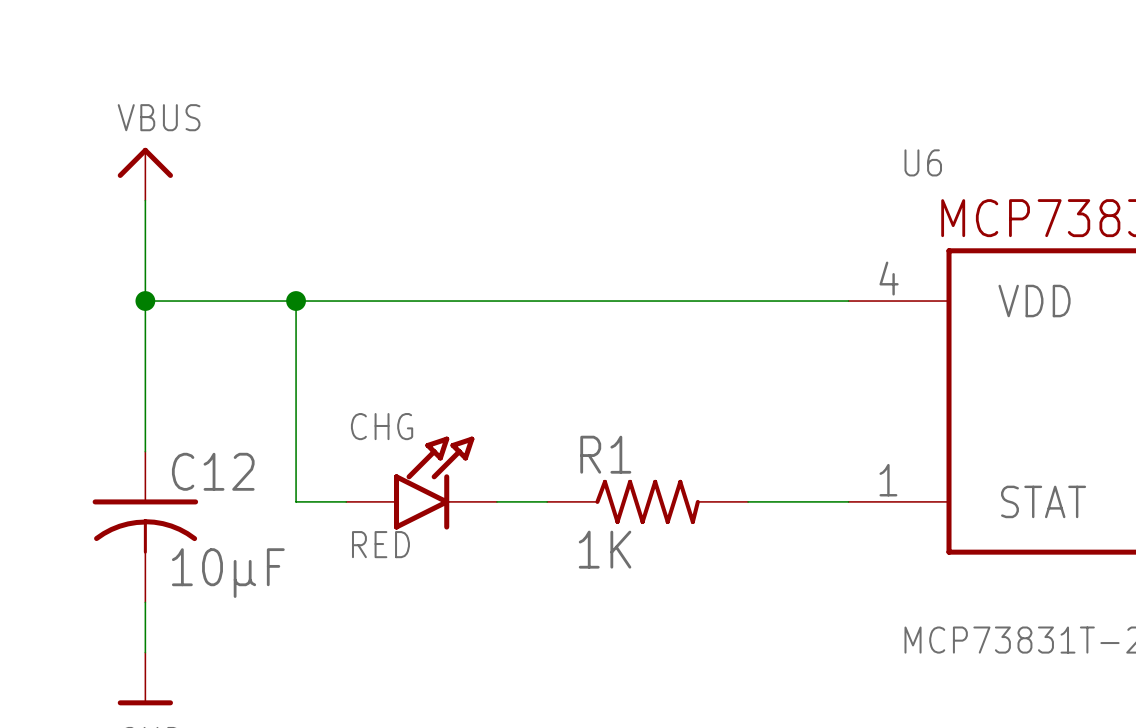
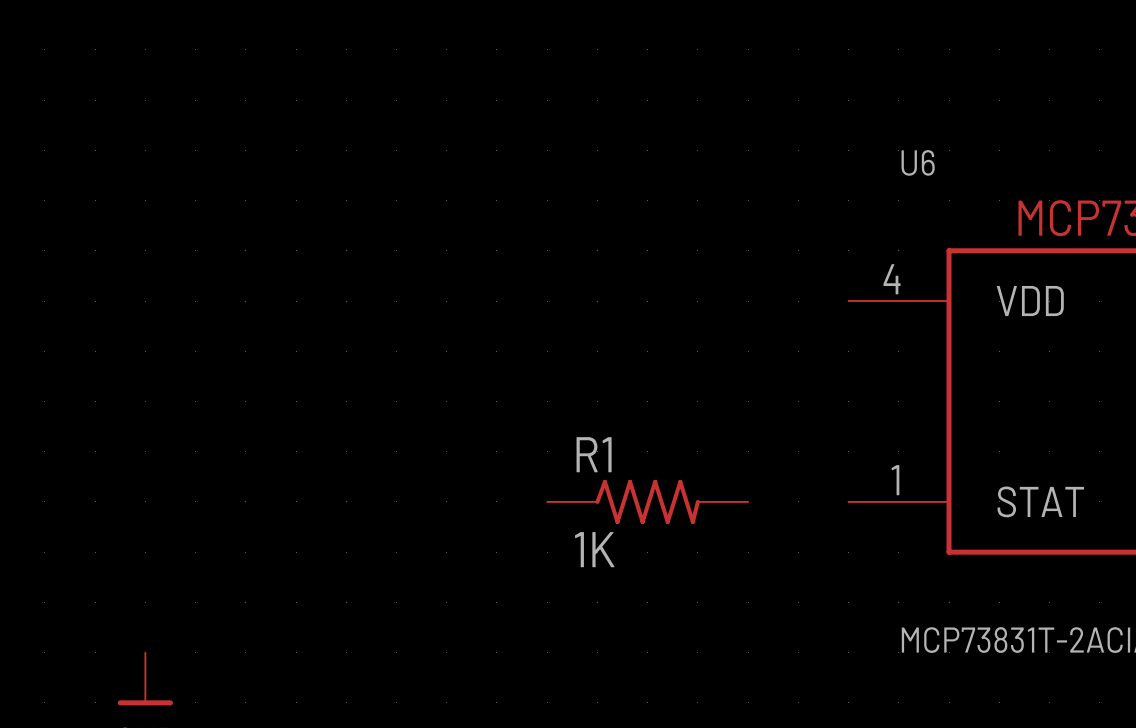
power symbol: VBUS (145, 174) -> none
wire: (145, 200) (145, 451) -> none
wire: (145, 301) (848, 301) -> none
junction: (145, 301) -> none
wire: (296, 301) (296, 501) (346, 501) -> none
junction: (296, 301) -> none
CHG: RED (421, 483) -> none
wire: (496, 501) (547, 501) -> none
wire: (748, 501) (848, 501) -> none
C12: 10µF (145, 527) -> none
wire: (145, 602) (145, 652) -> none

